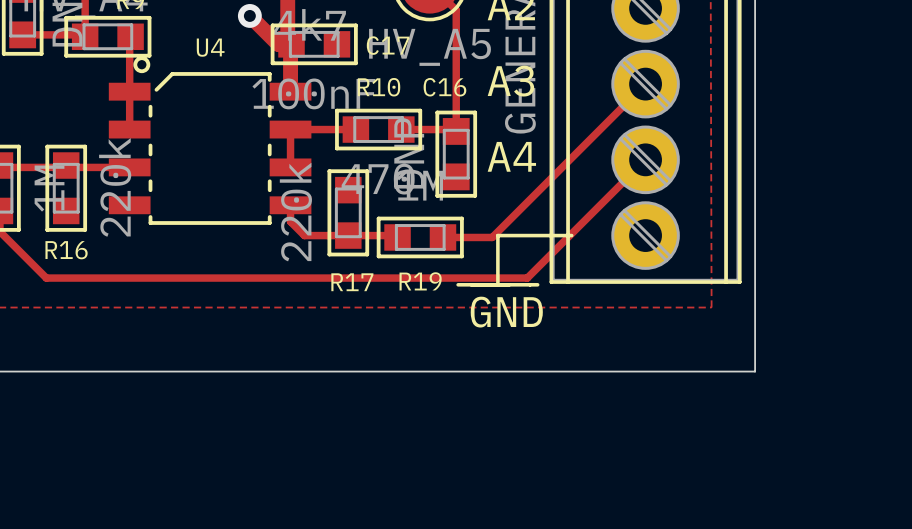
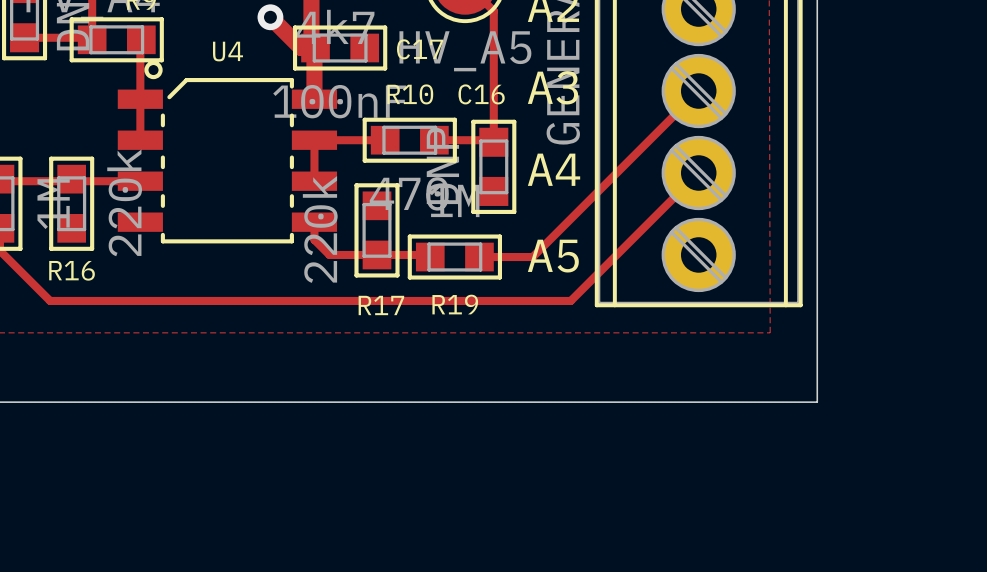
line: (571, 235) (497, 235) (497, 284) -> none
text: none -> A5 (553, 256)
line: (458, 284) (537, 284) -> none
text: GND (506, 312) -> none

